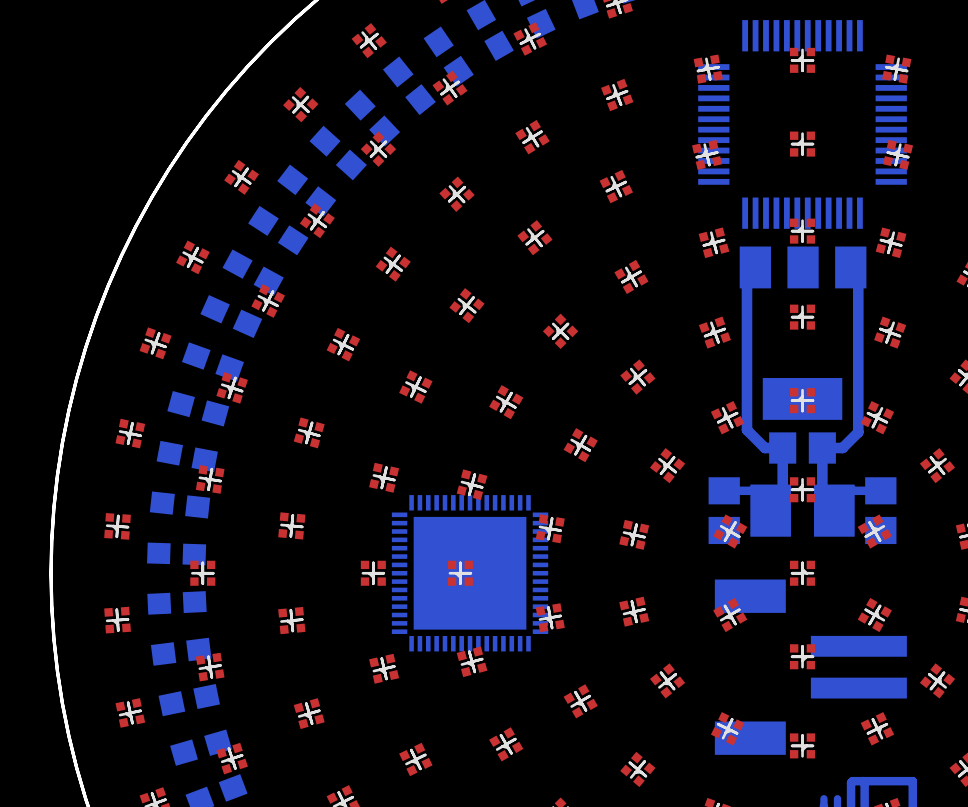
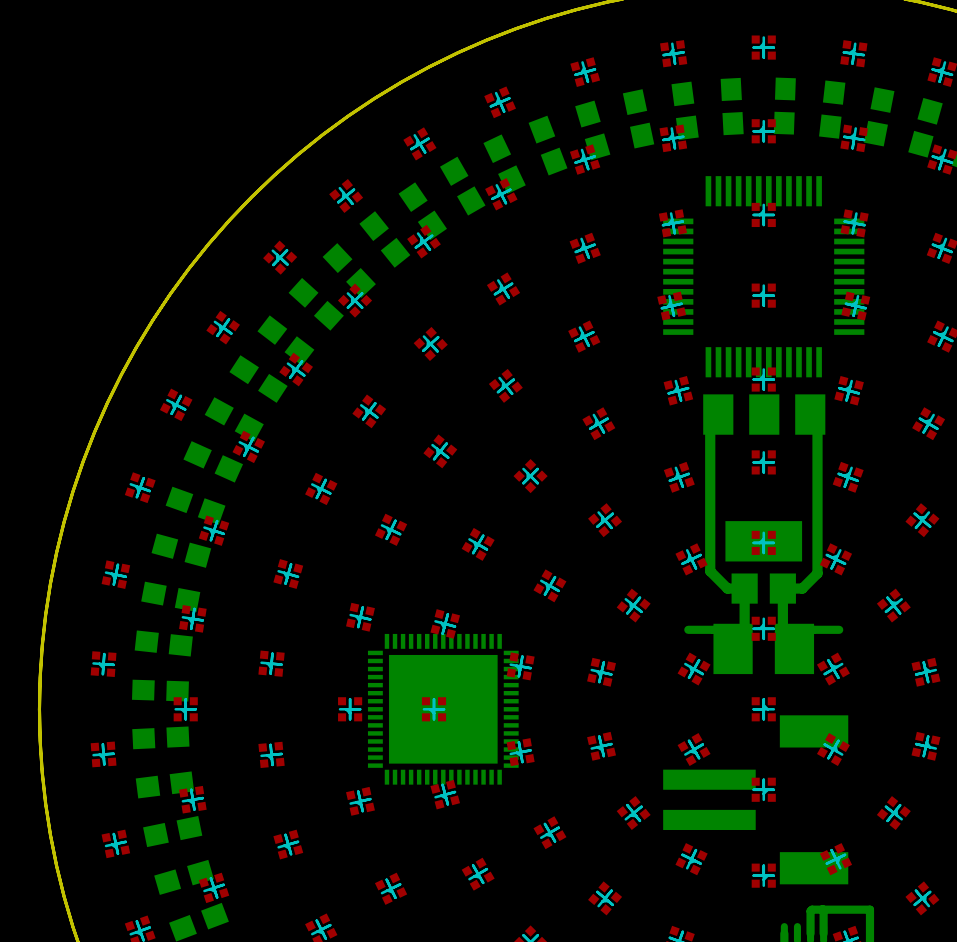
part: (724, 510) -> none
part: (880, 510) -> none
part rotation: 0° (810, 667) -> 180° (755, 799)

